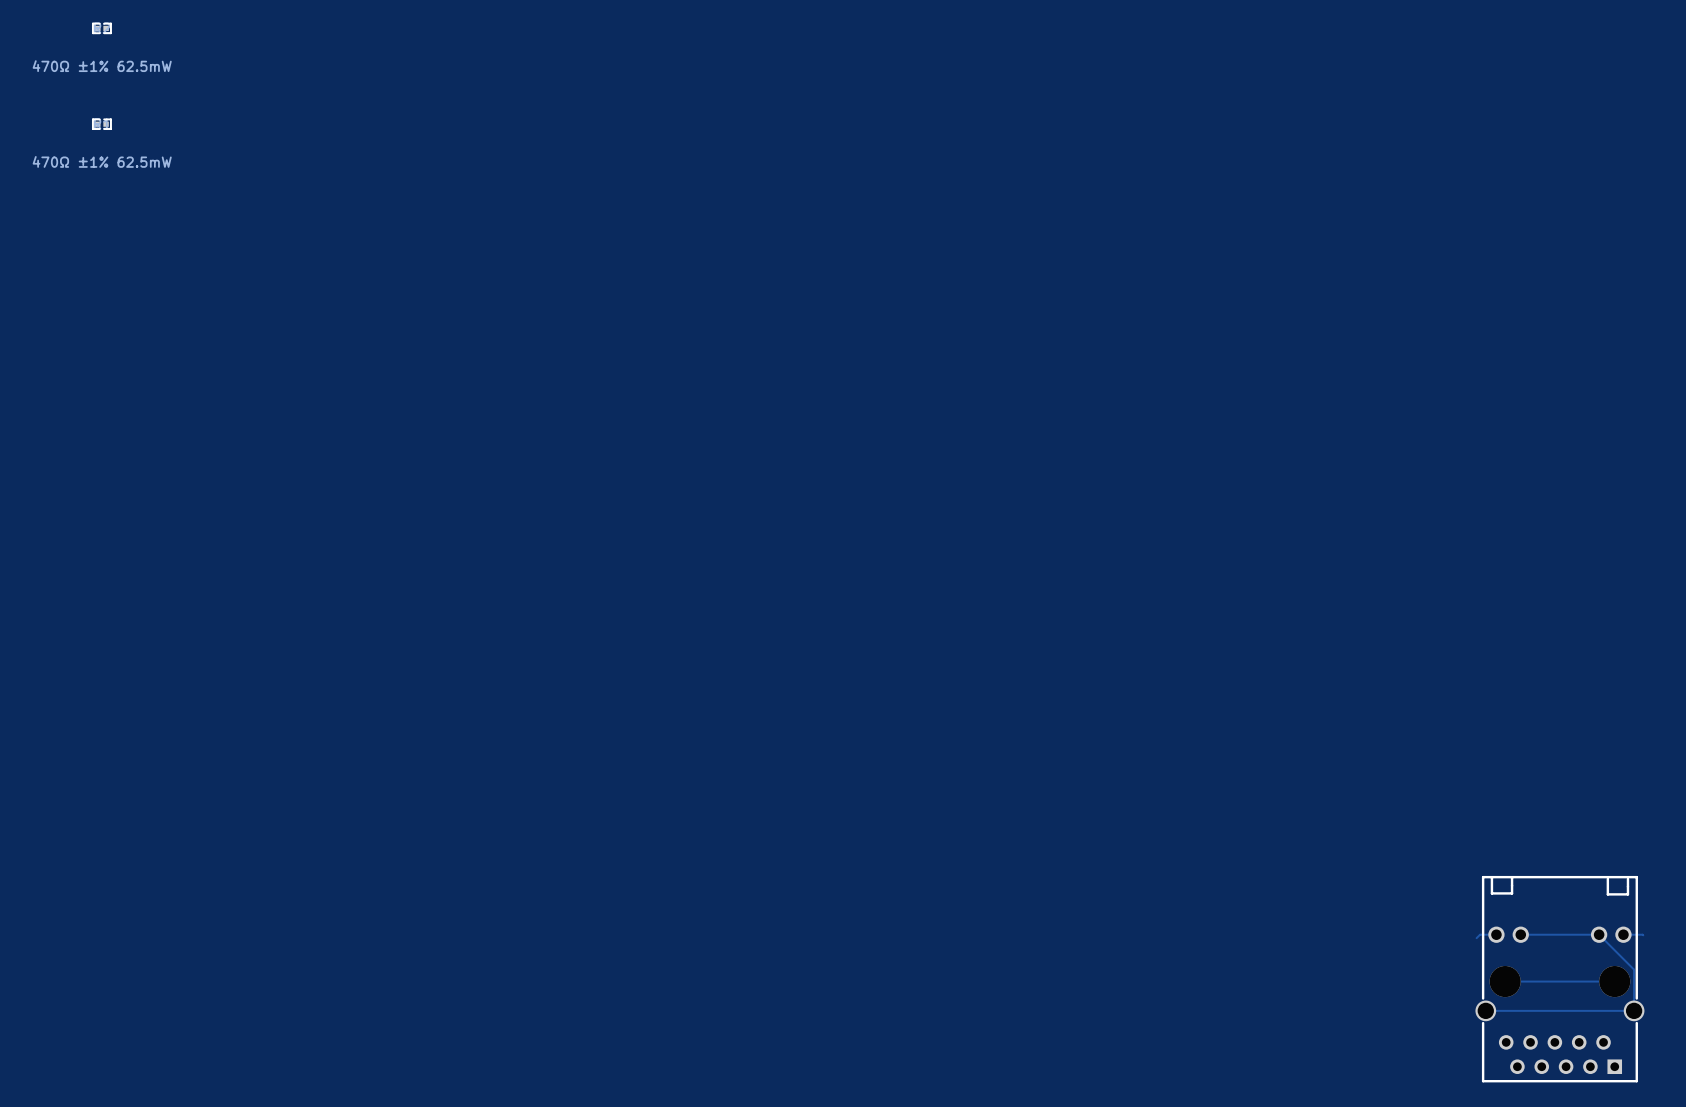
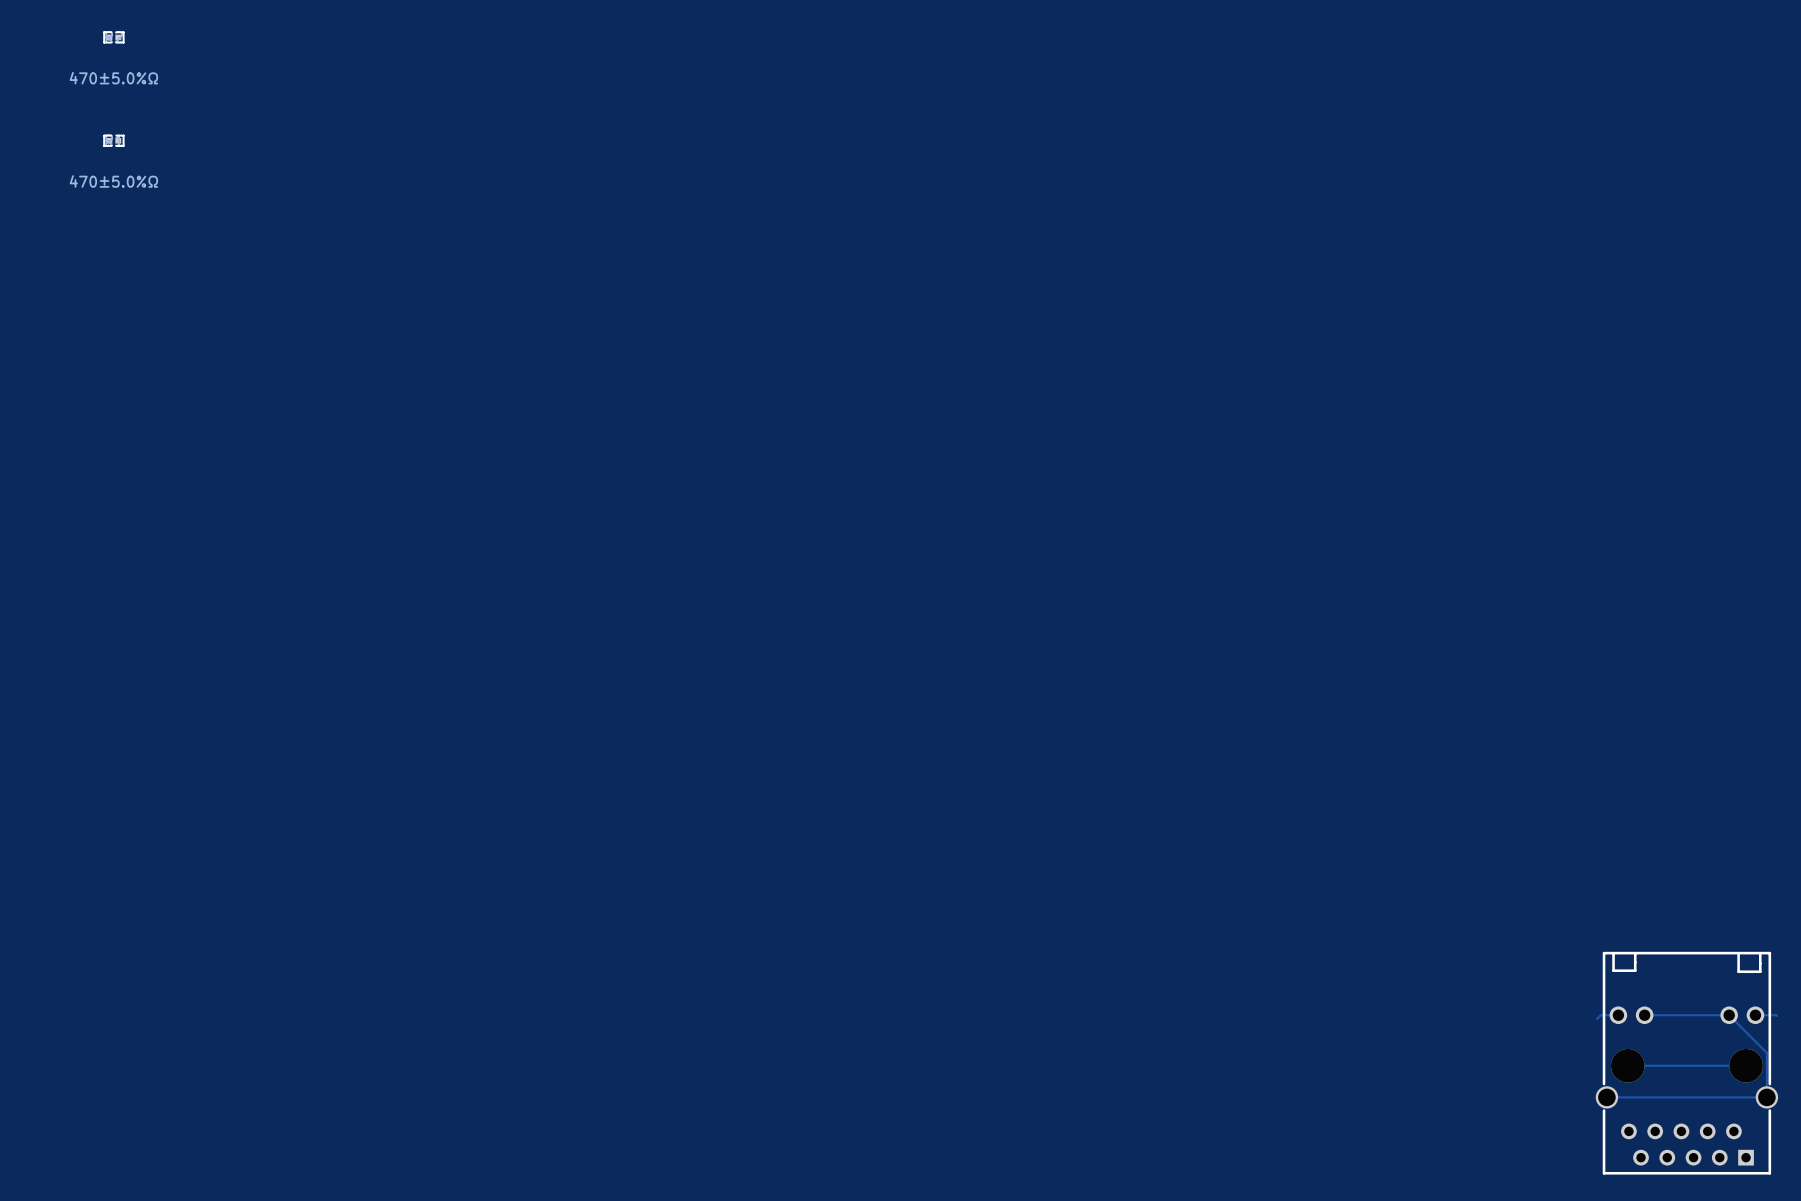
part value: 470Ω ±1% 62.5mW (102, 66) -> 470±5.0%Ω (113, 78)
part value: 470Ω ±1% 62.5mW (102, 161) -> 470±5.0%Ω (113, 181)

